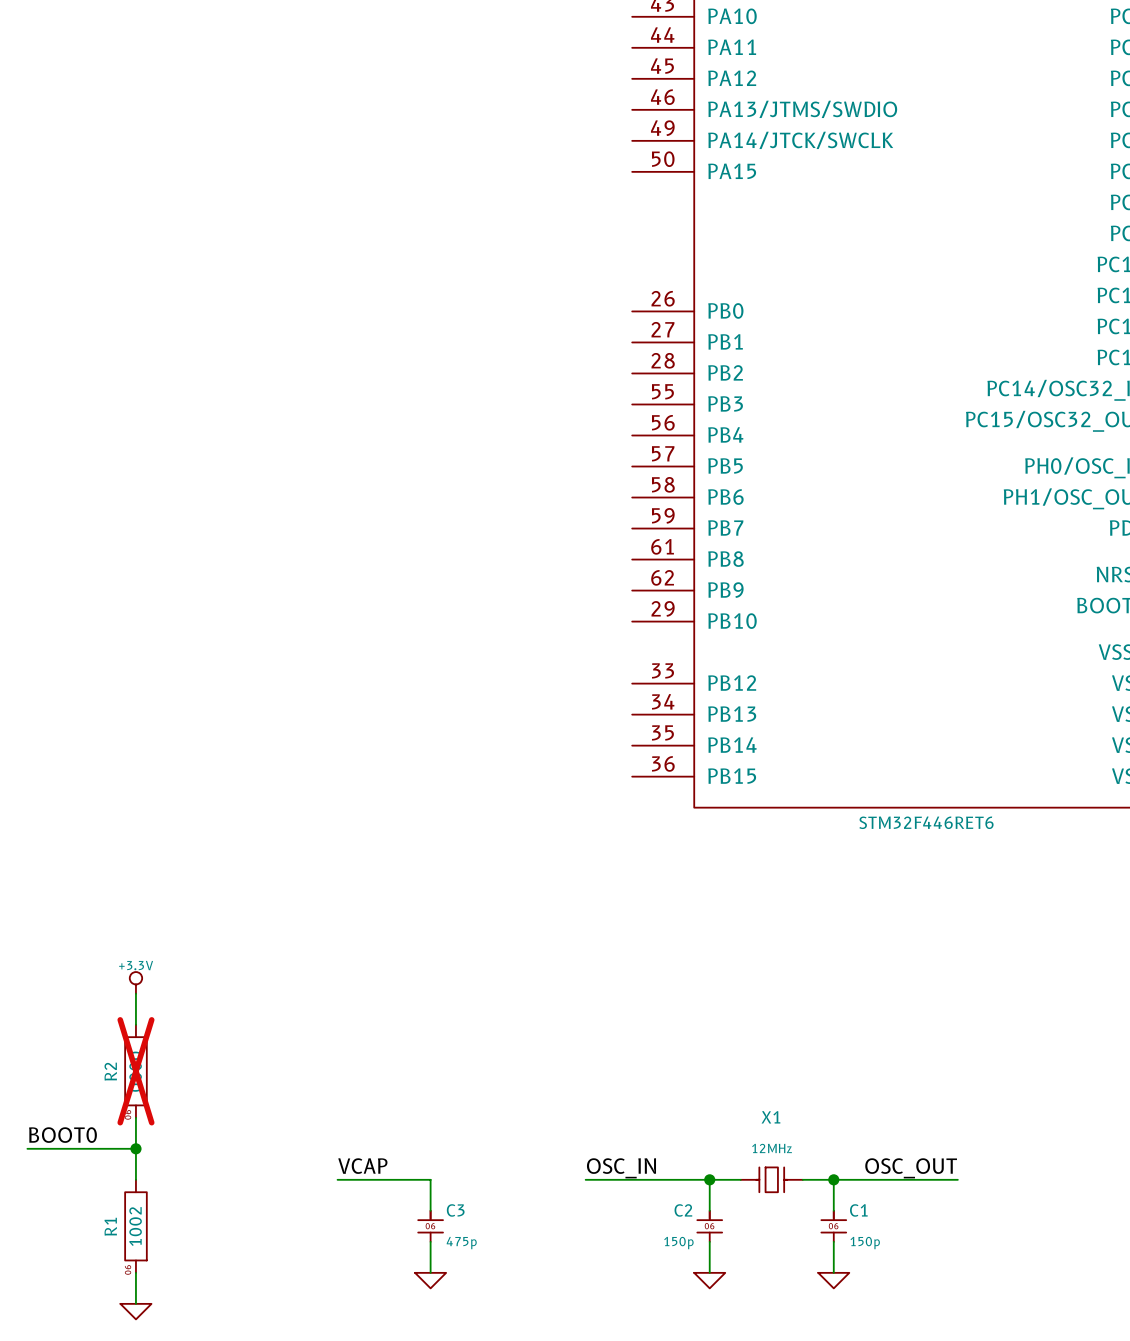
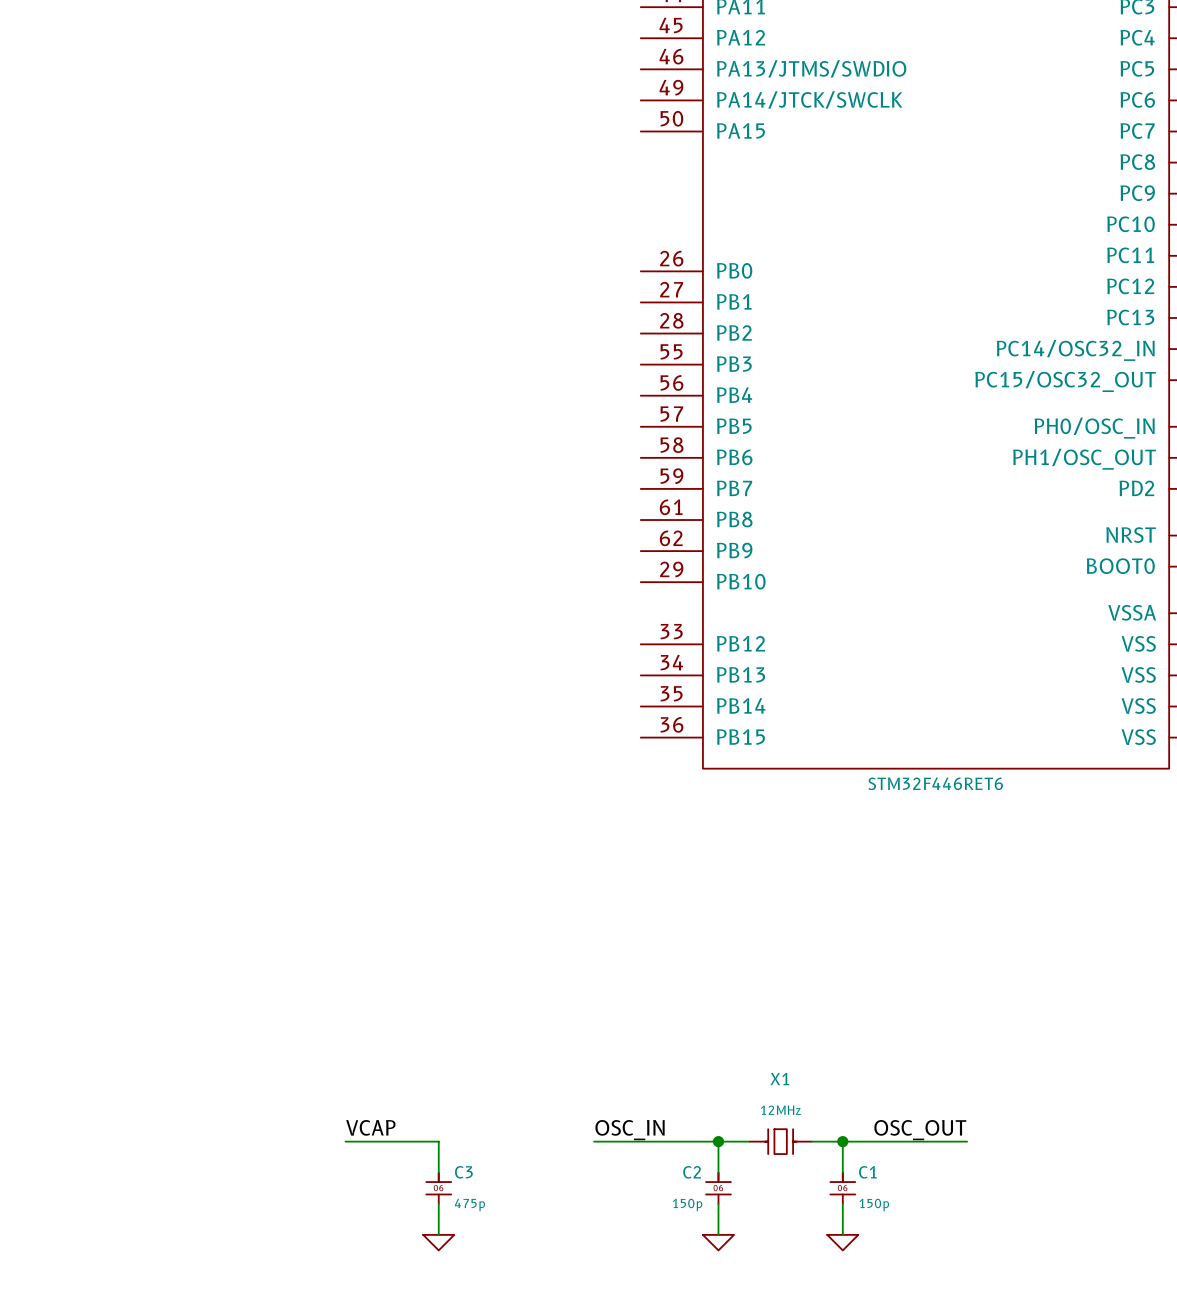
power symbol: +3.3V (135, 982) -> none
wire: (135, 993) (135, 1024) -> none
R2: (135, 1071) -> none
wire: (135, 1117) (135, 1179) -> none
label: BOOT0 (62, 1135) -> none
wire: (27, 1148) (135, 1148) -> none
junction: (135, 1148) -> none
R1: (135, 1226) -> none
wire: (135, 1272) (135, 1303) -> none
power symbol: (135, 1311) -> none

